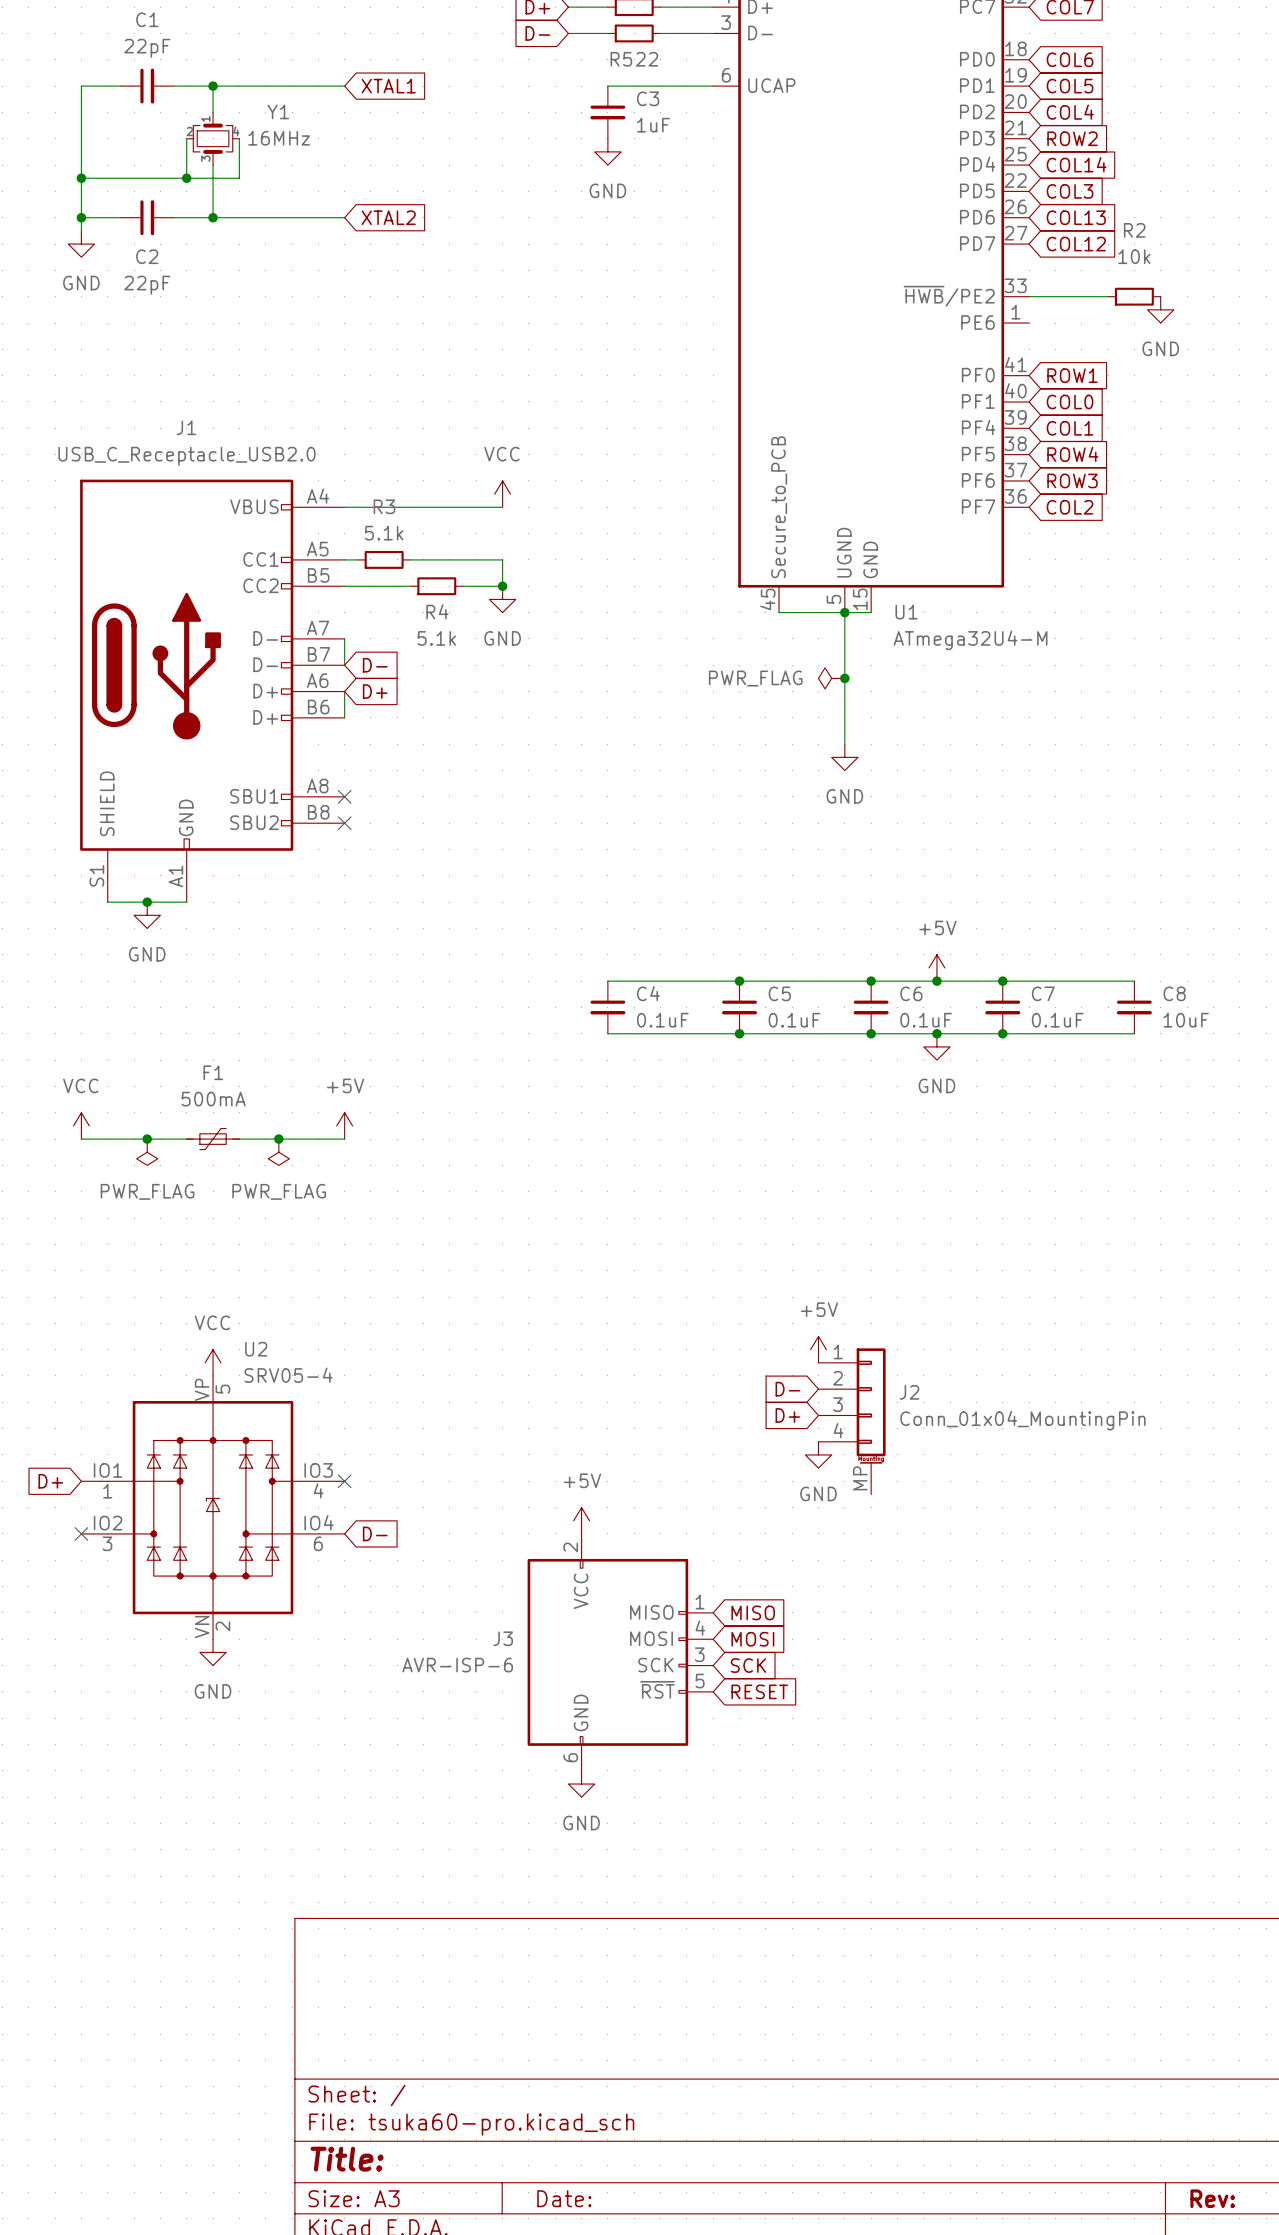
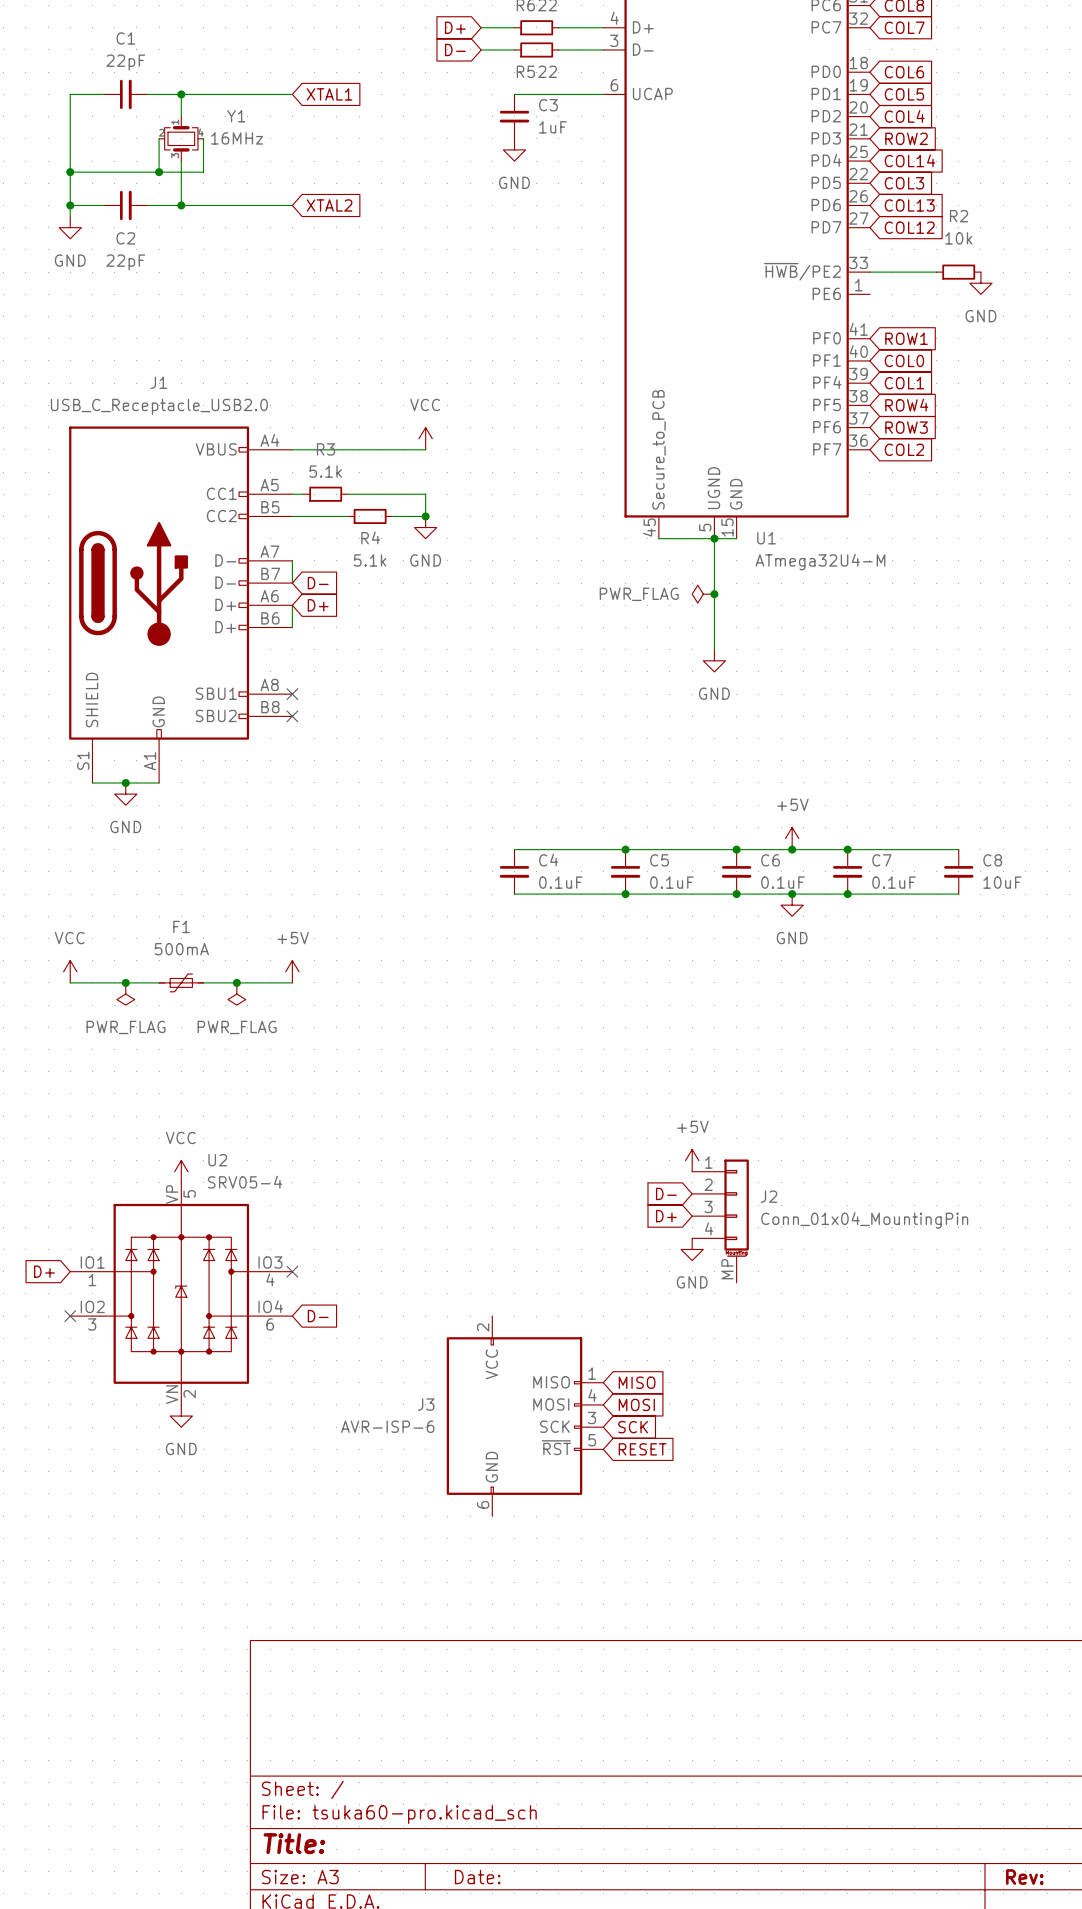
power symbol: +5V (581, 1520) -> none
power symbol: GND (581, 1784) -> none

